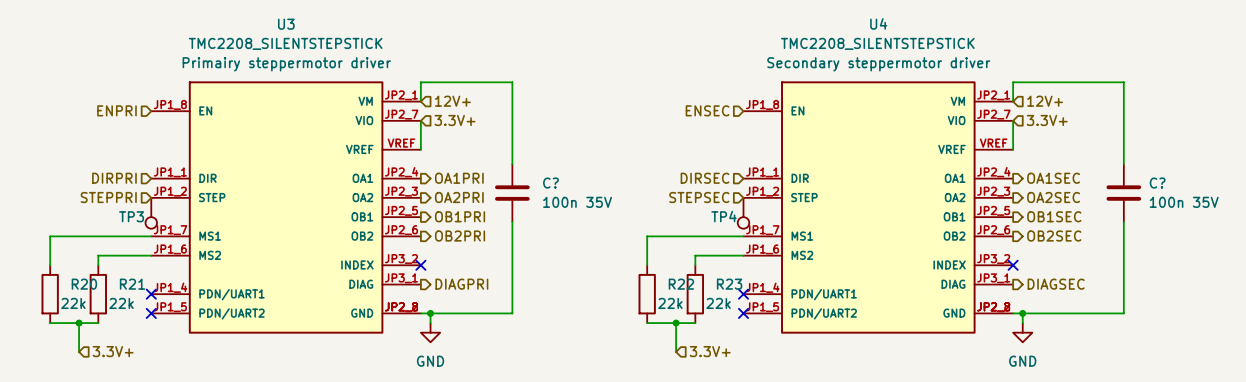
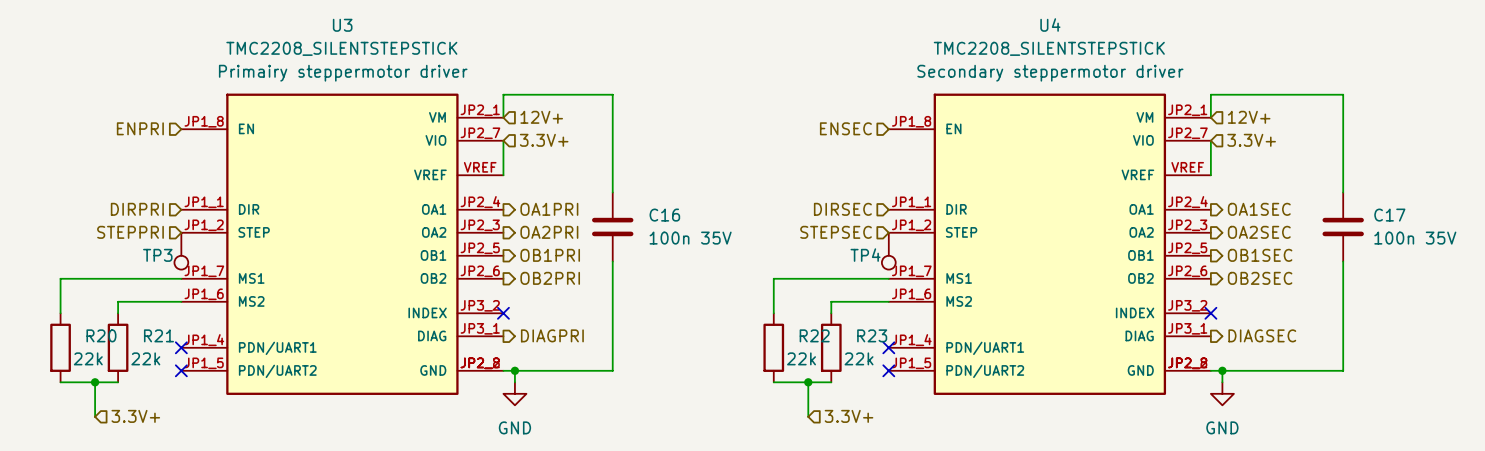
C? name: C? (550, 183) -> C16 (664, 215)
C? name: C? (1157, 183) -> C17 (1389, 215)

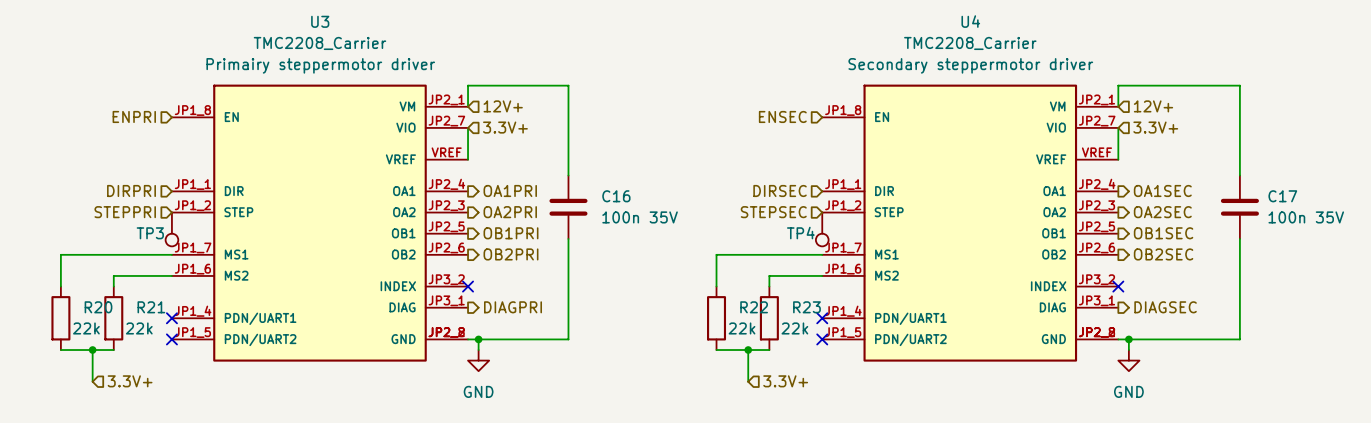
U3 value: TMC2208_SILENTSTEPSTICK (341, 48) -> TMC2208_Carrier (319, 43)
U4 value: TMC2208_SILENTSTEPSTICK (1049, 48) -> TMC2208_Carrier (970, 43)

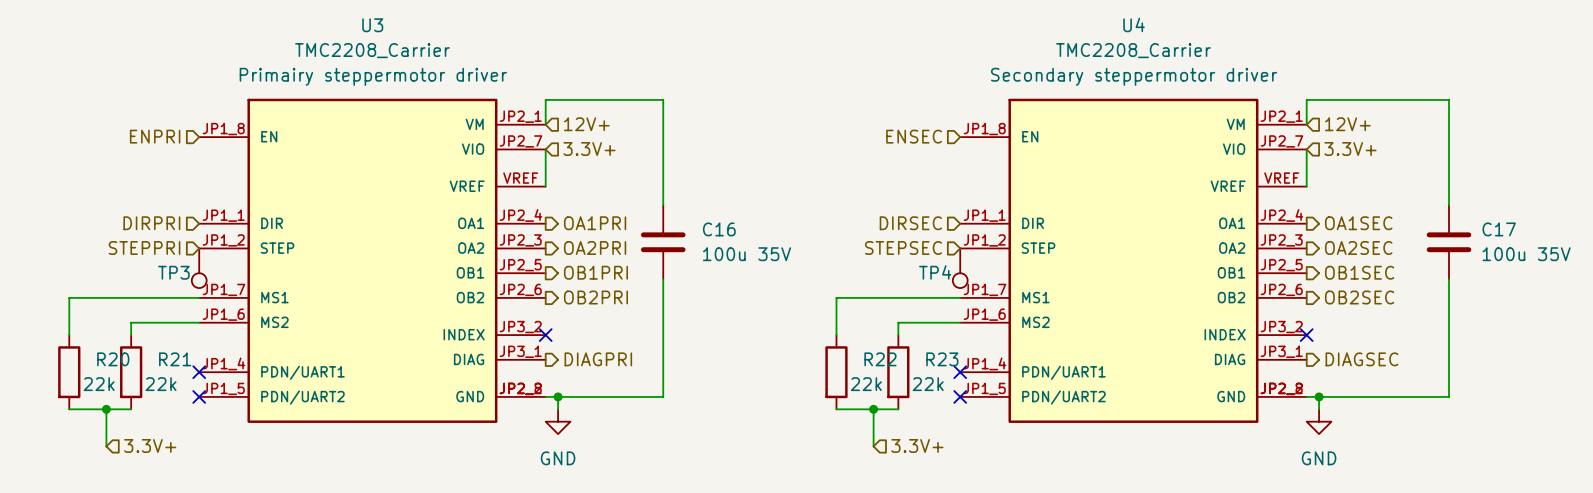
C16 value: 100n 35V (640, 217) -> 100u 35V (747, 254)
C17 value: 100n 35V (1306, 217) -> 100u 35V (1526, 254)

